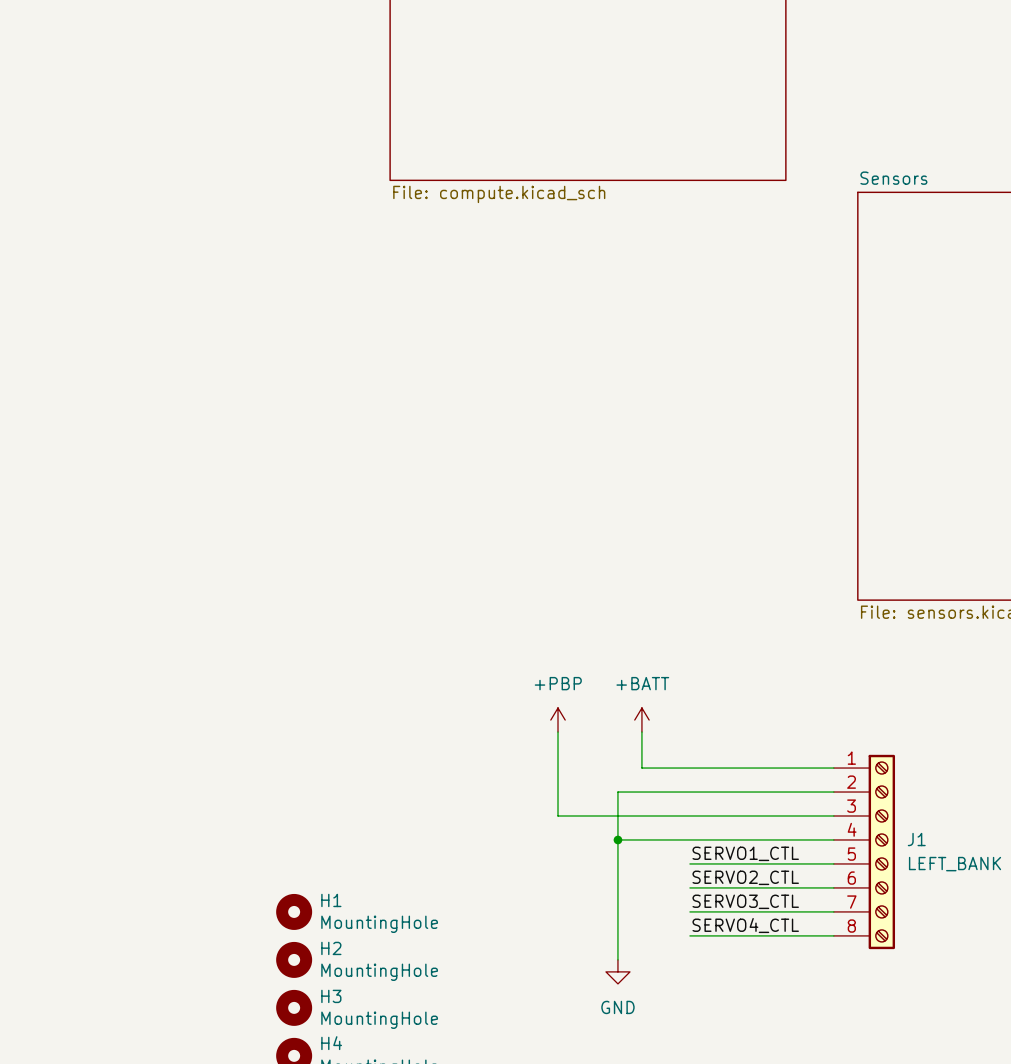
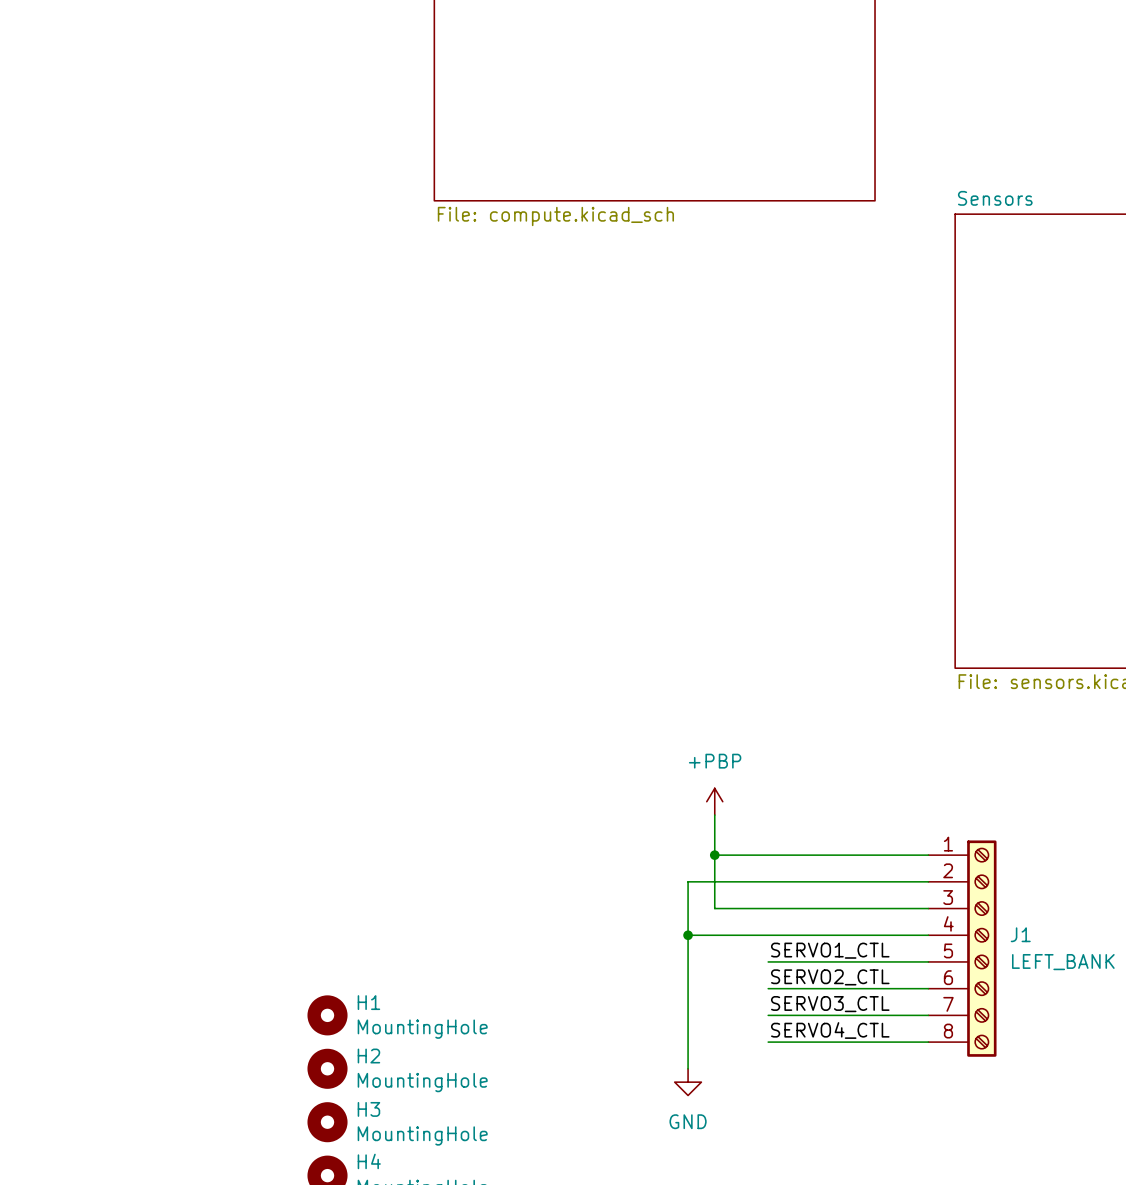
power symbol: +PBP (558, 720) -> none
power symbol: +BATT (641, 720) -> +PBP (714, 801)
wire: (558, 732) (558, 816) (641, 816) -> (714, 855) (714, 908)
junction: none -> (714, 855)

